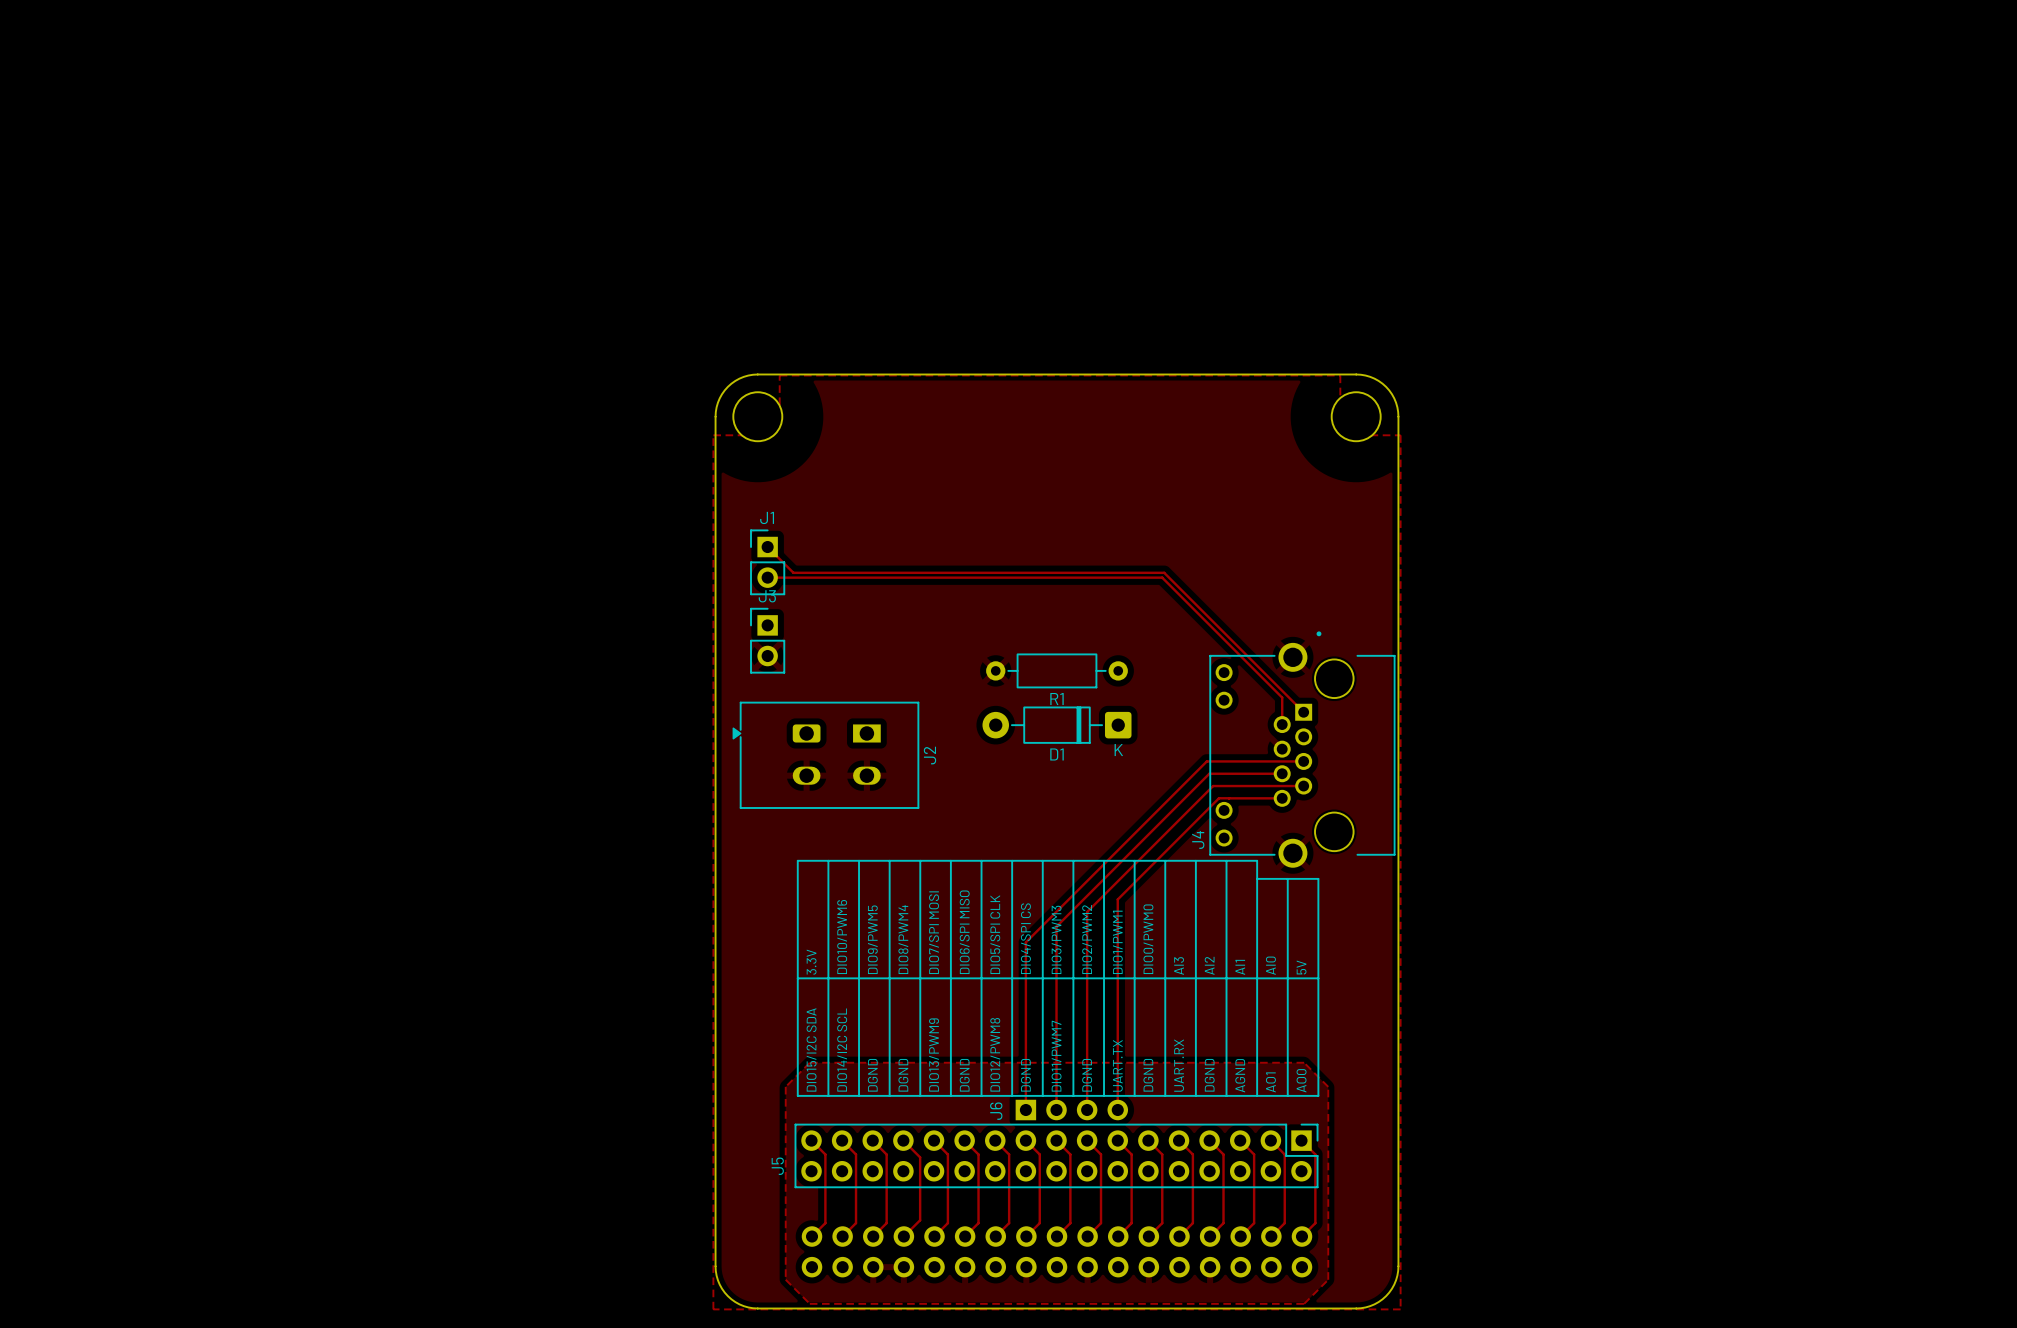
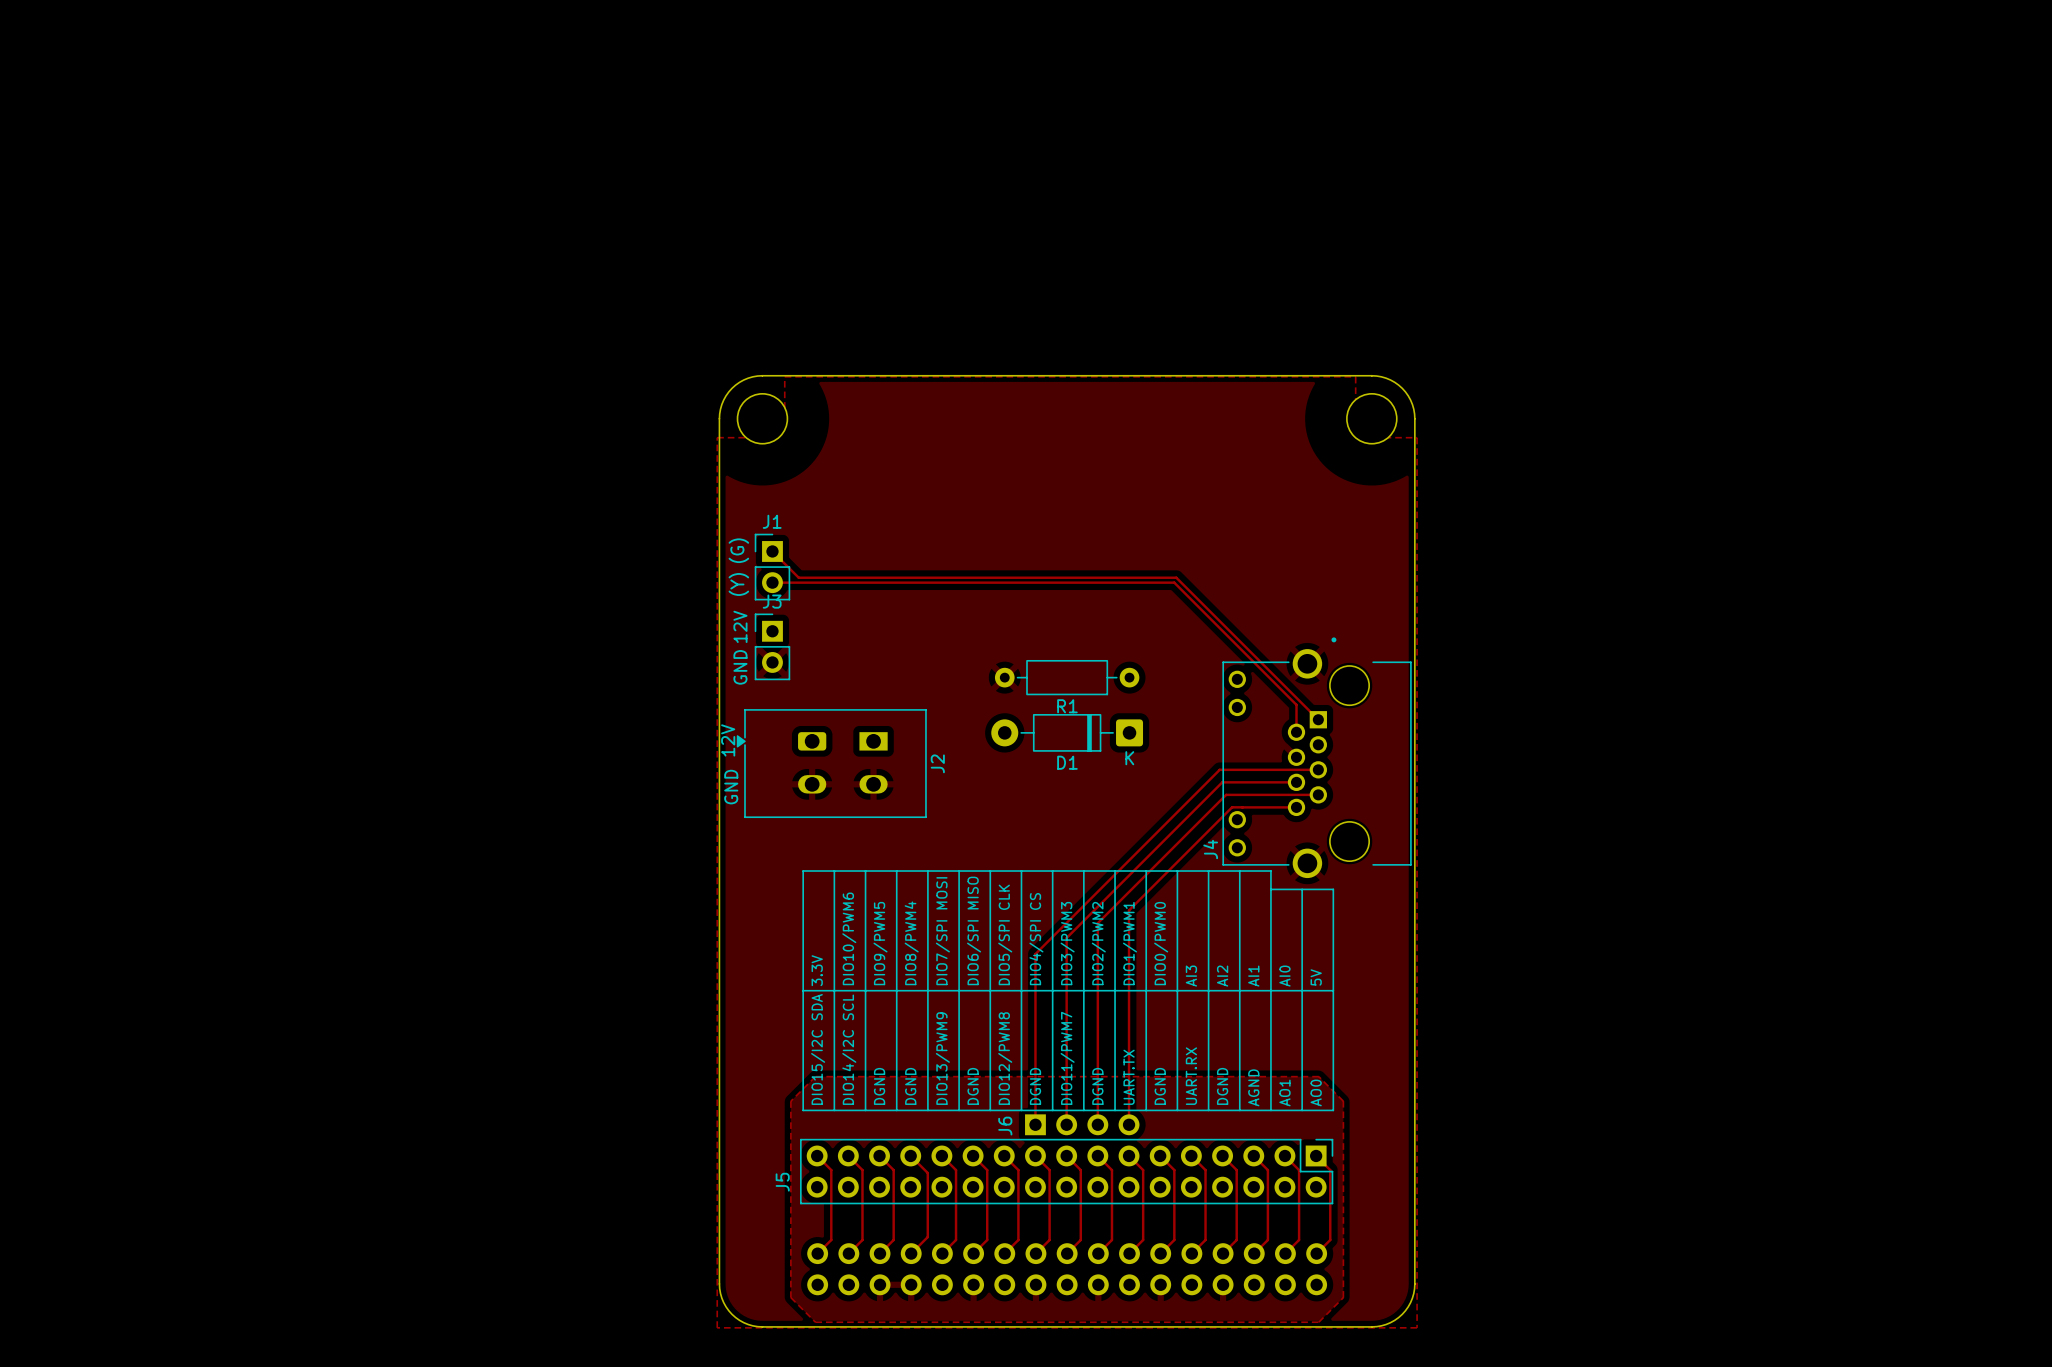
text: none -> (G) (738, 550)
text: none -> (Y) (738, 584)
text: none -> 12V (740, 626)
text: none -> GND (740, 667)
text: none -> 12V (728, 740)
text: none -> GND (731, 787)

